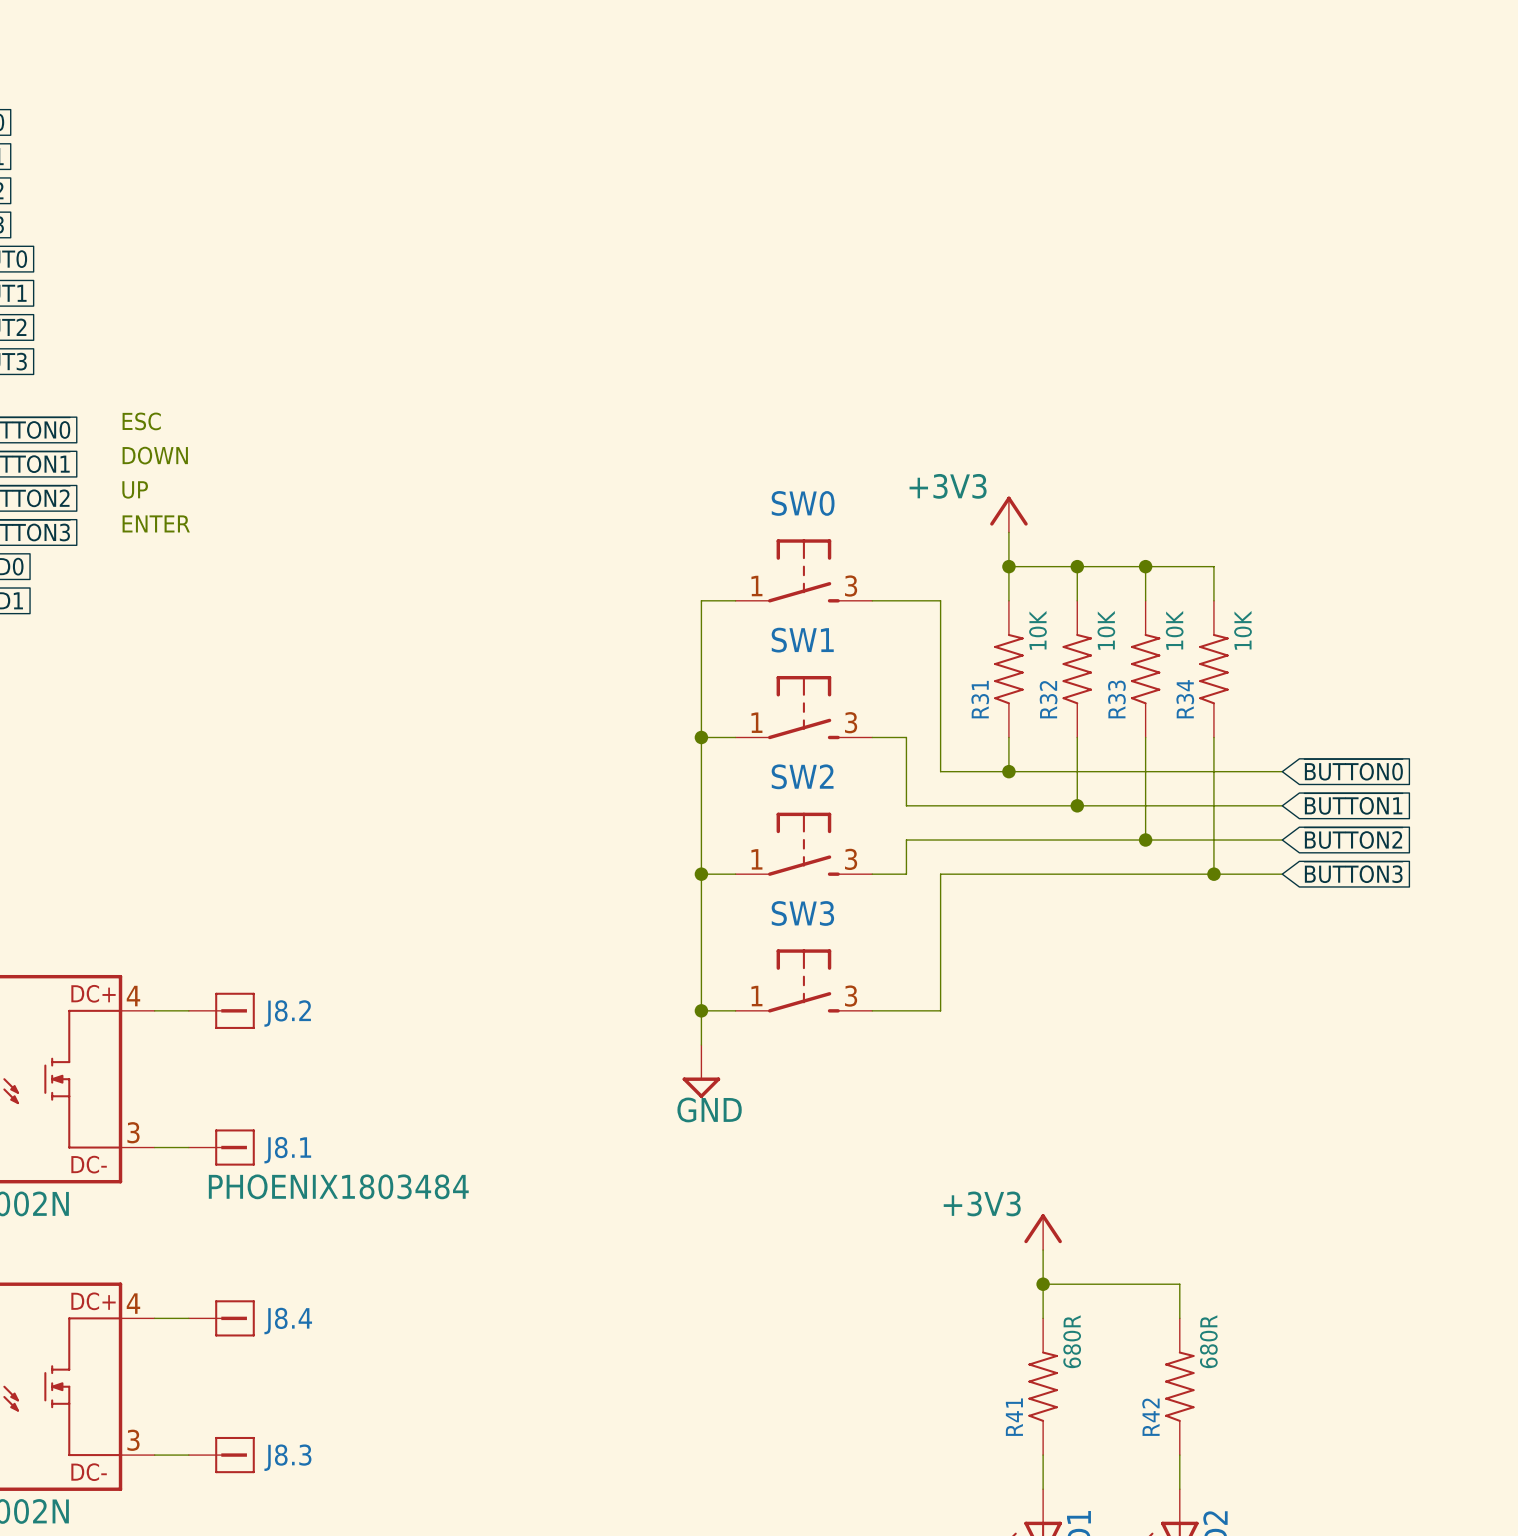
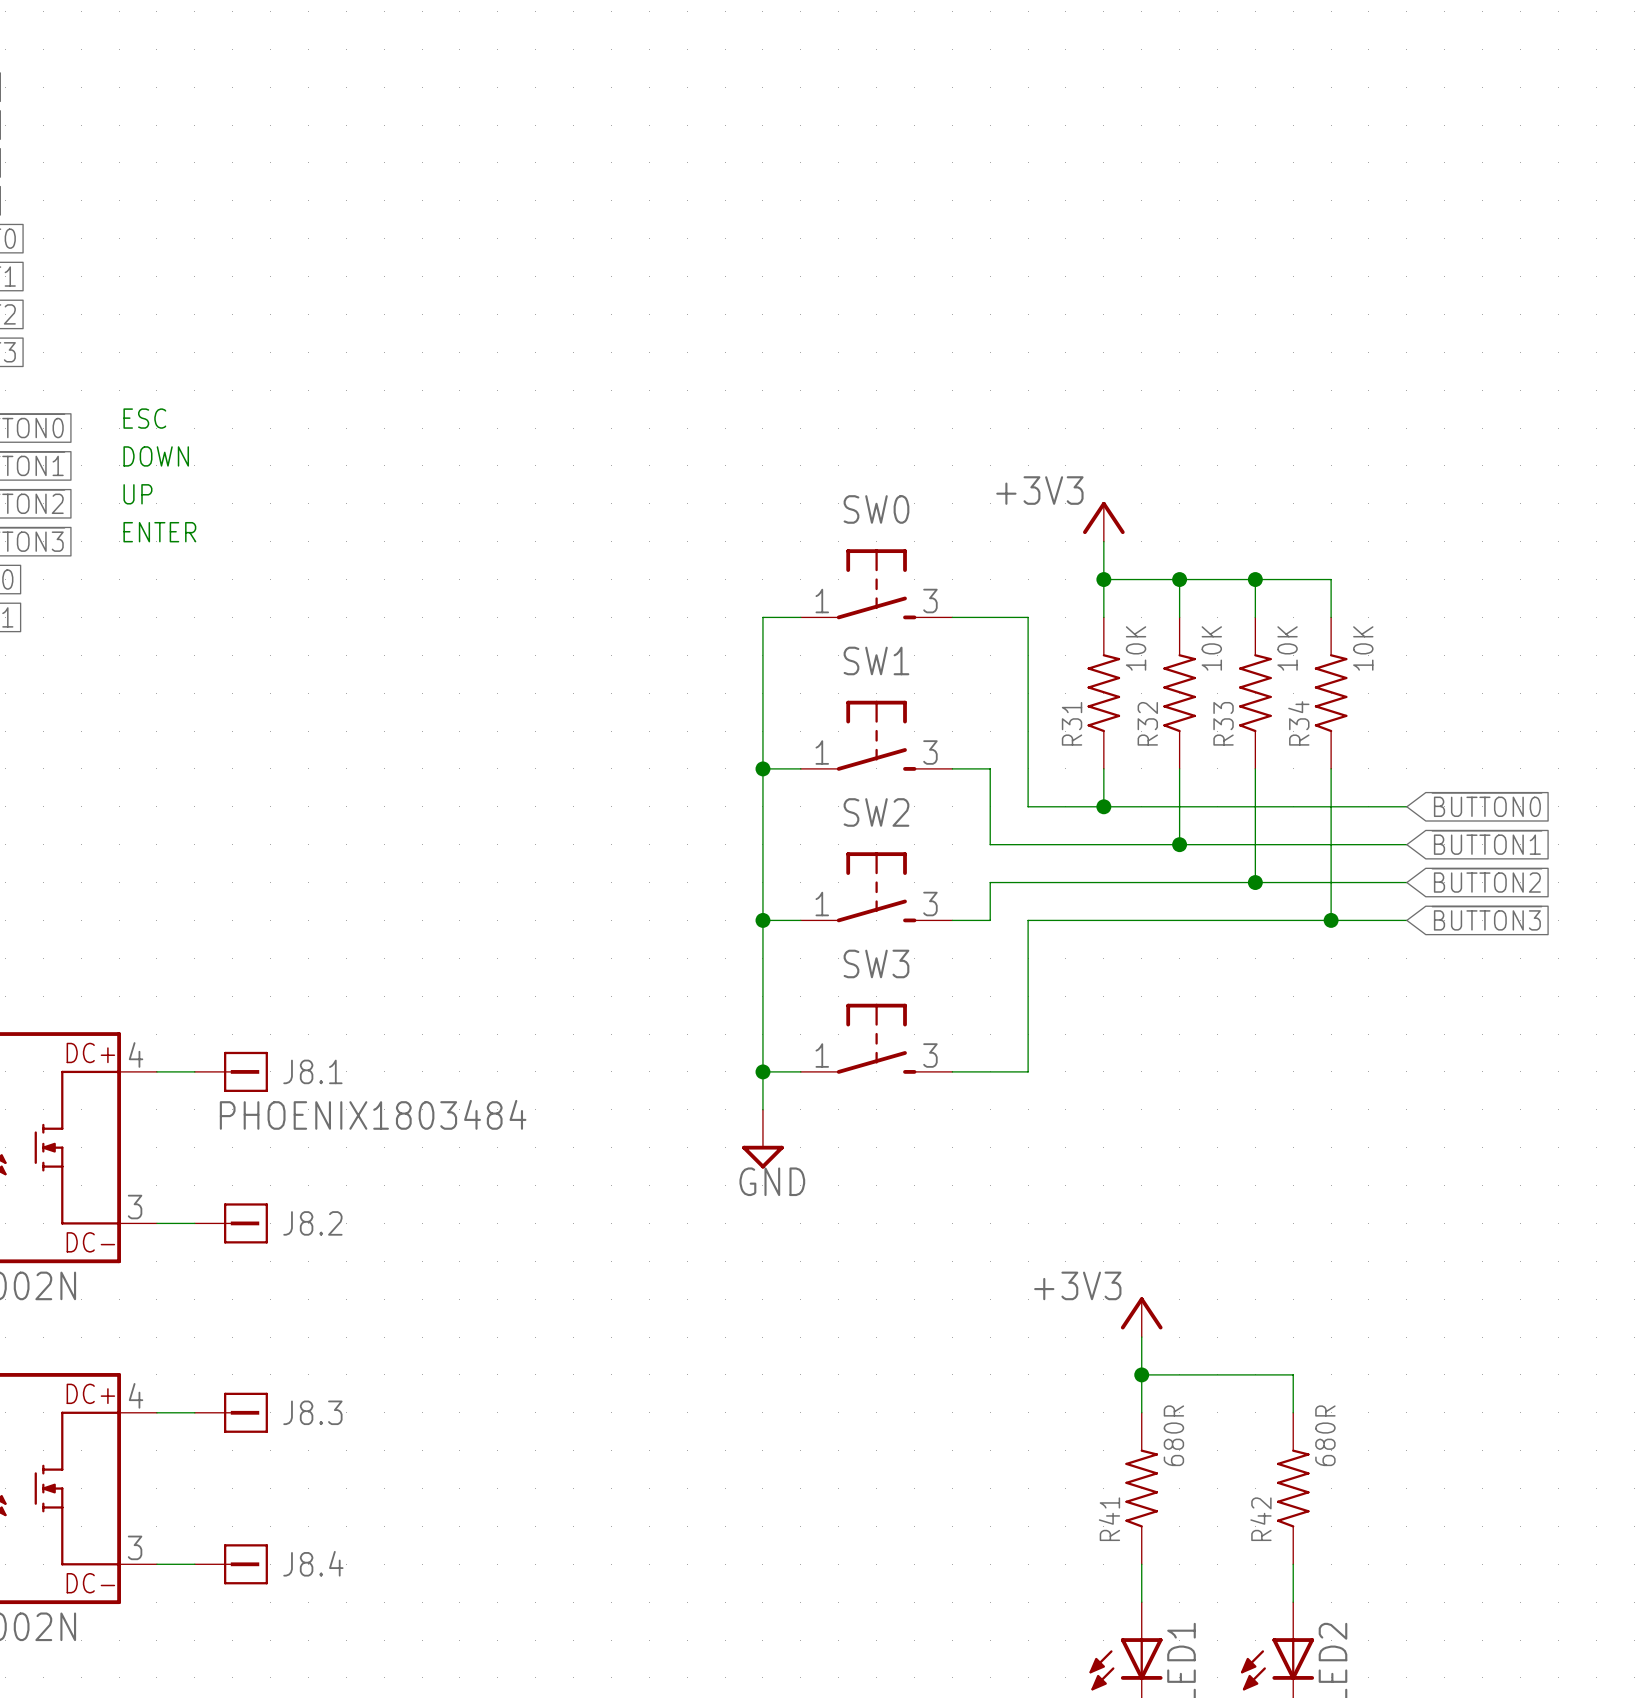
J8.2 name: J8.2 (287, 1013) -> J8.1 (312, 1071)
J8.2 value: none -> PHOENIX1803484 (373, 1114)
J8.1 name: J8.1 (287, 1150) -> J8.2 (312, 1223)
J8.1 value: PHOENIX1803484 (338, 1186) -> none
J8.4 name: J8.4 (288, 1321) -> J8.3 (312, 1412)
J8.3 name: J8.3 (287, 1457) -> J8.4 (313, 1563)

